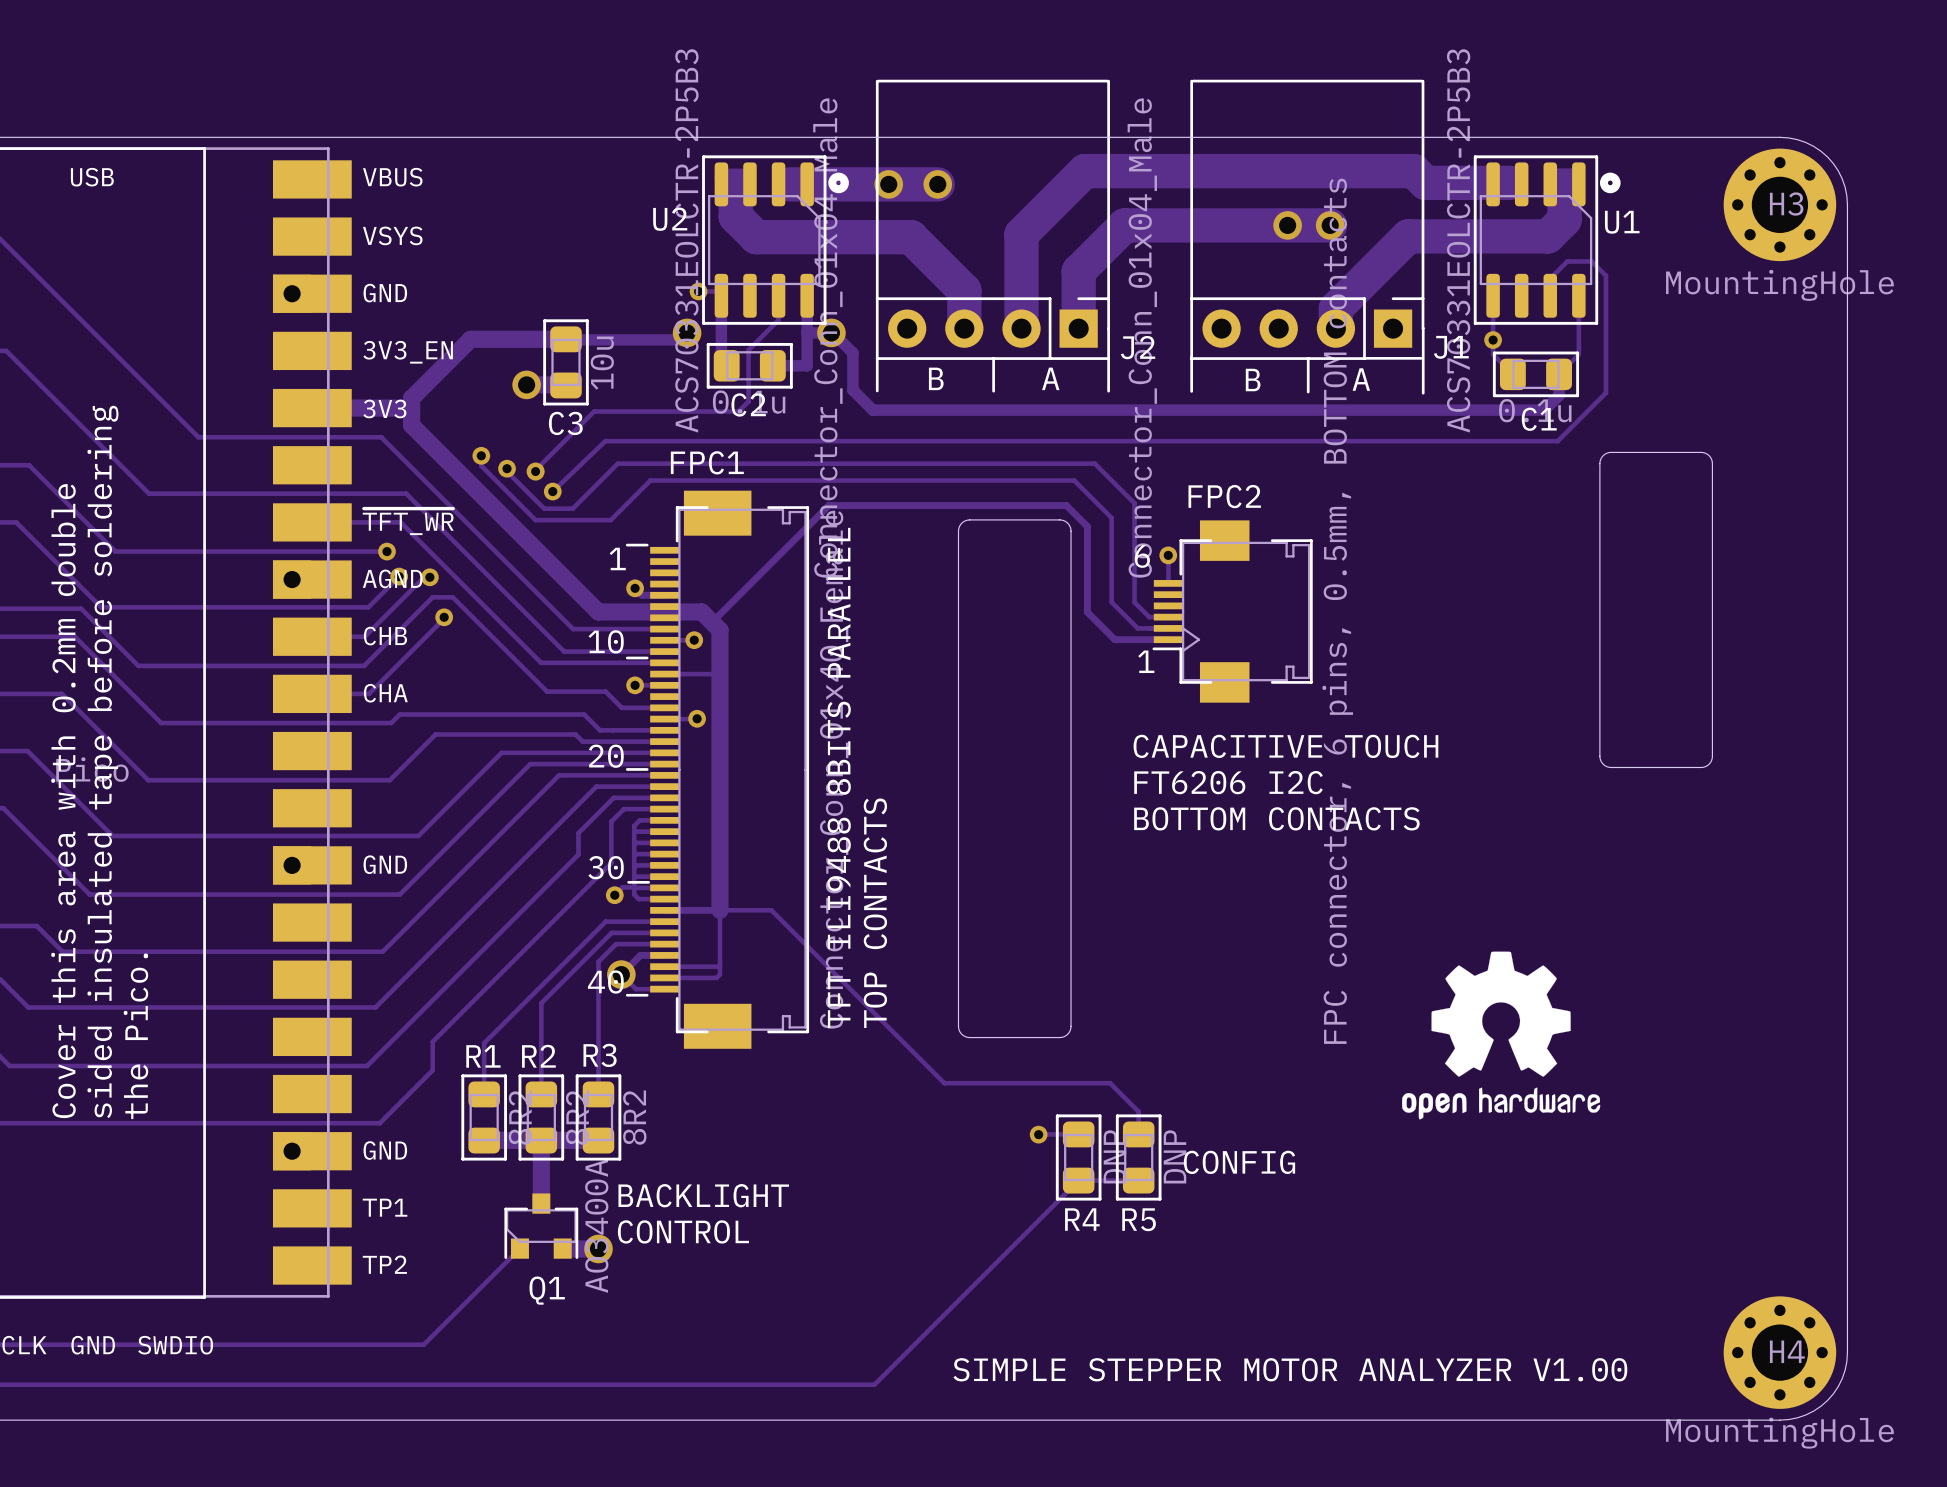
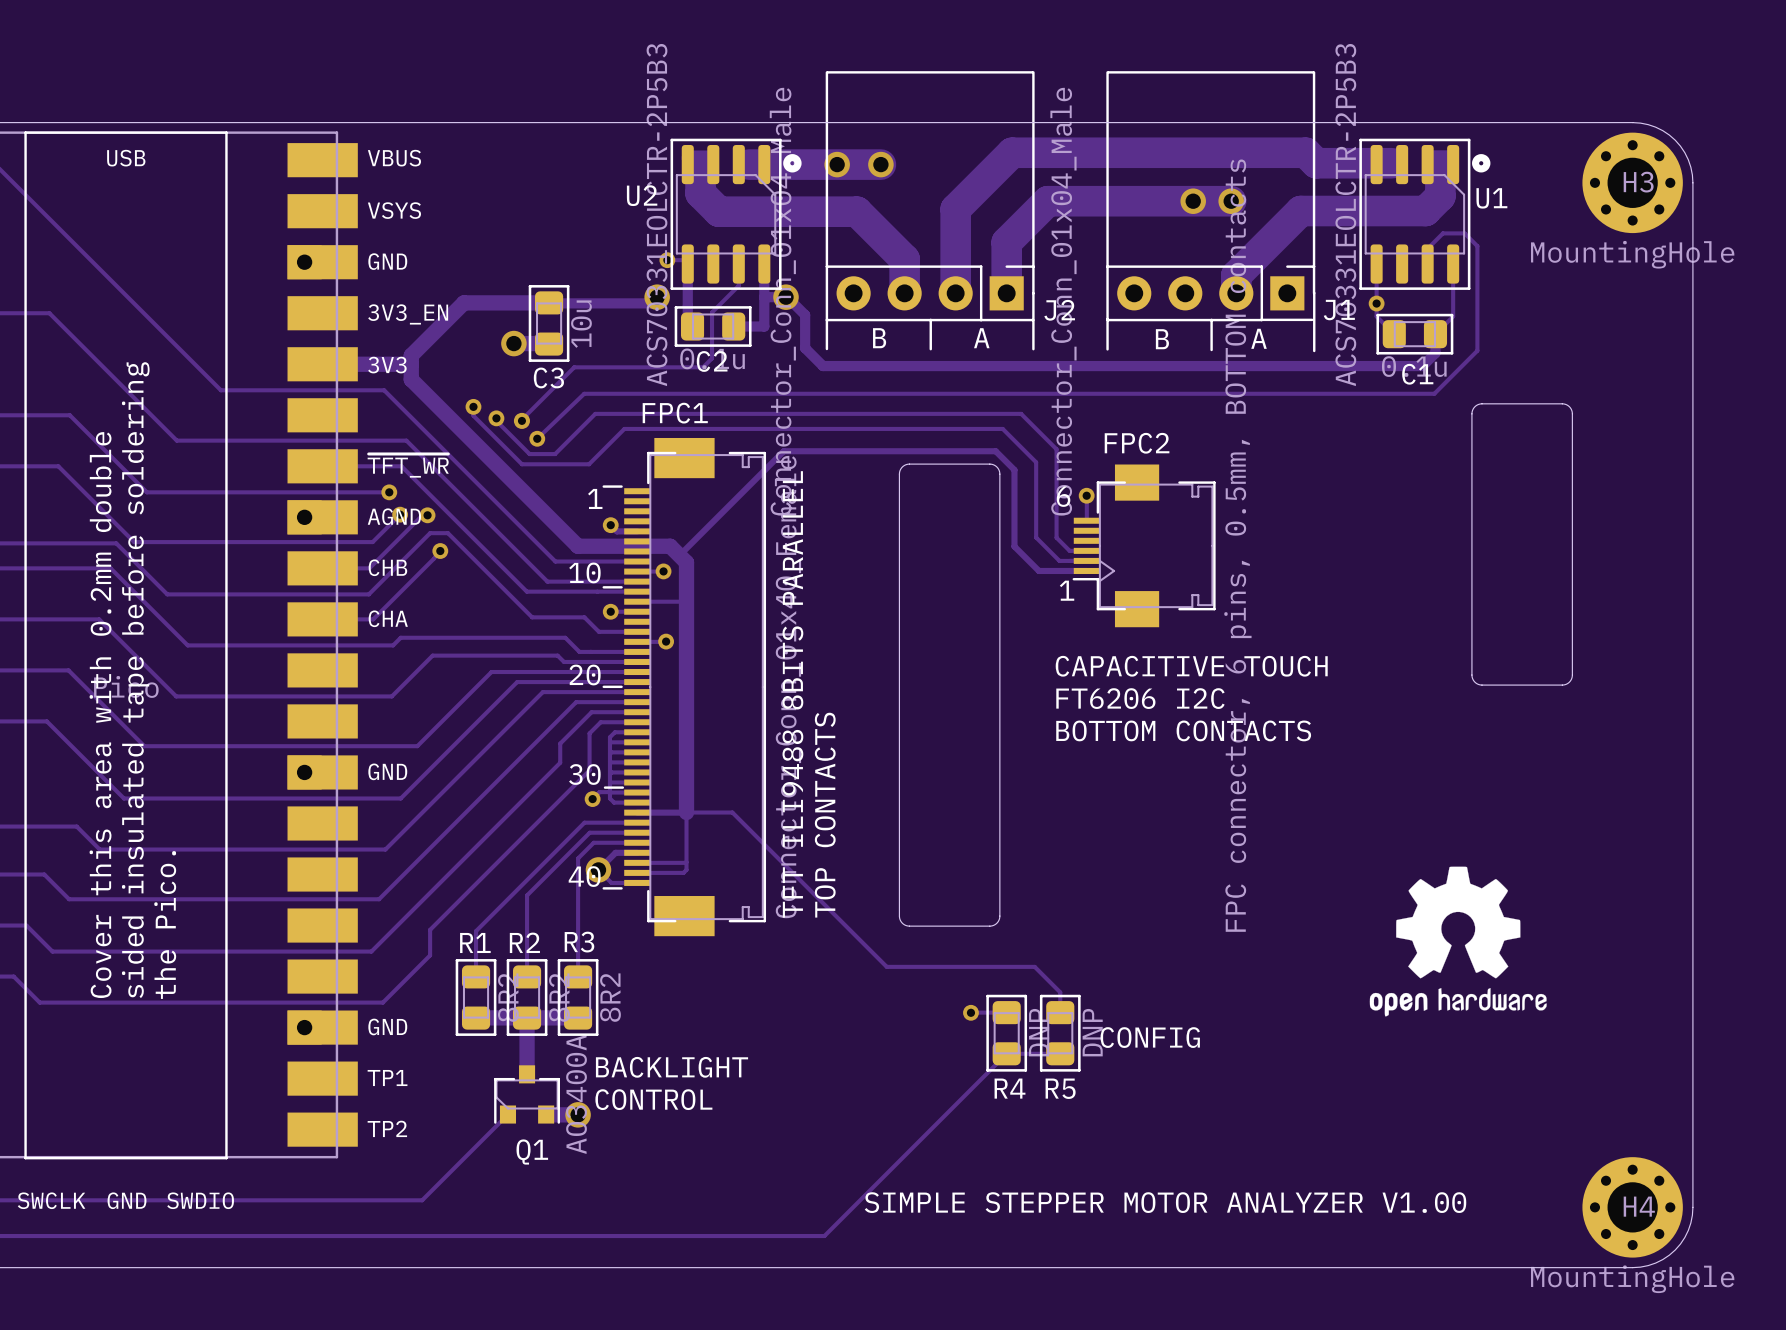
drawing position: (1501, 1035) -> (1458, 941)
text position: SIMPLE STEPPER MOTOR ANALYZER V1.00 (1290, 1369) -> SIMPLE STEPPER MOTOR ANALYZER V1.00 (1165, 1202)

